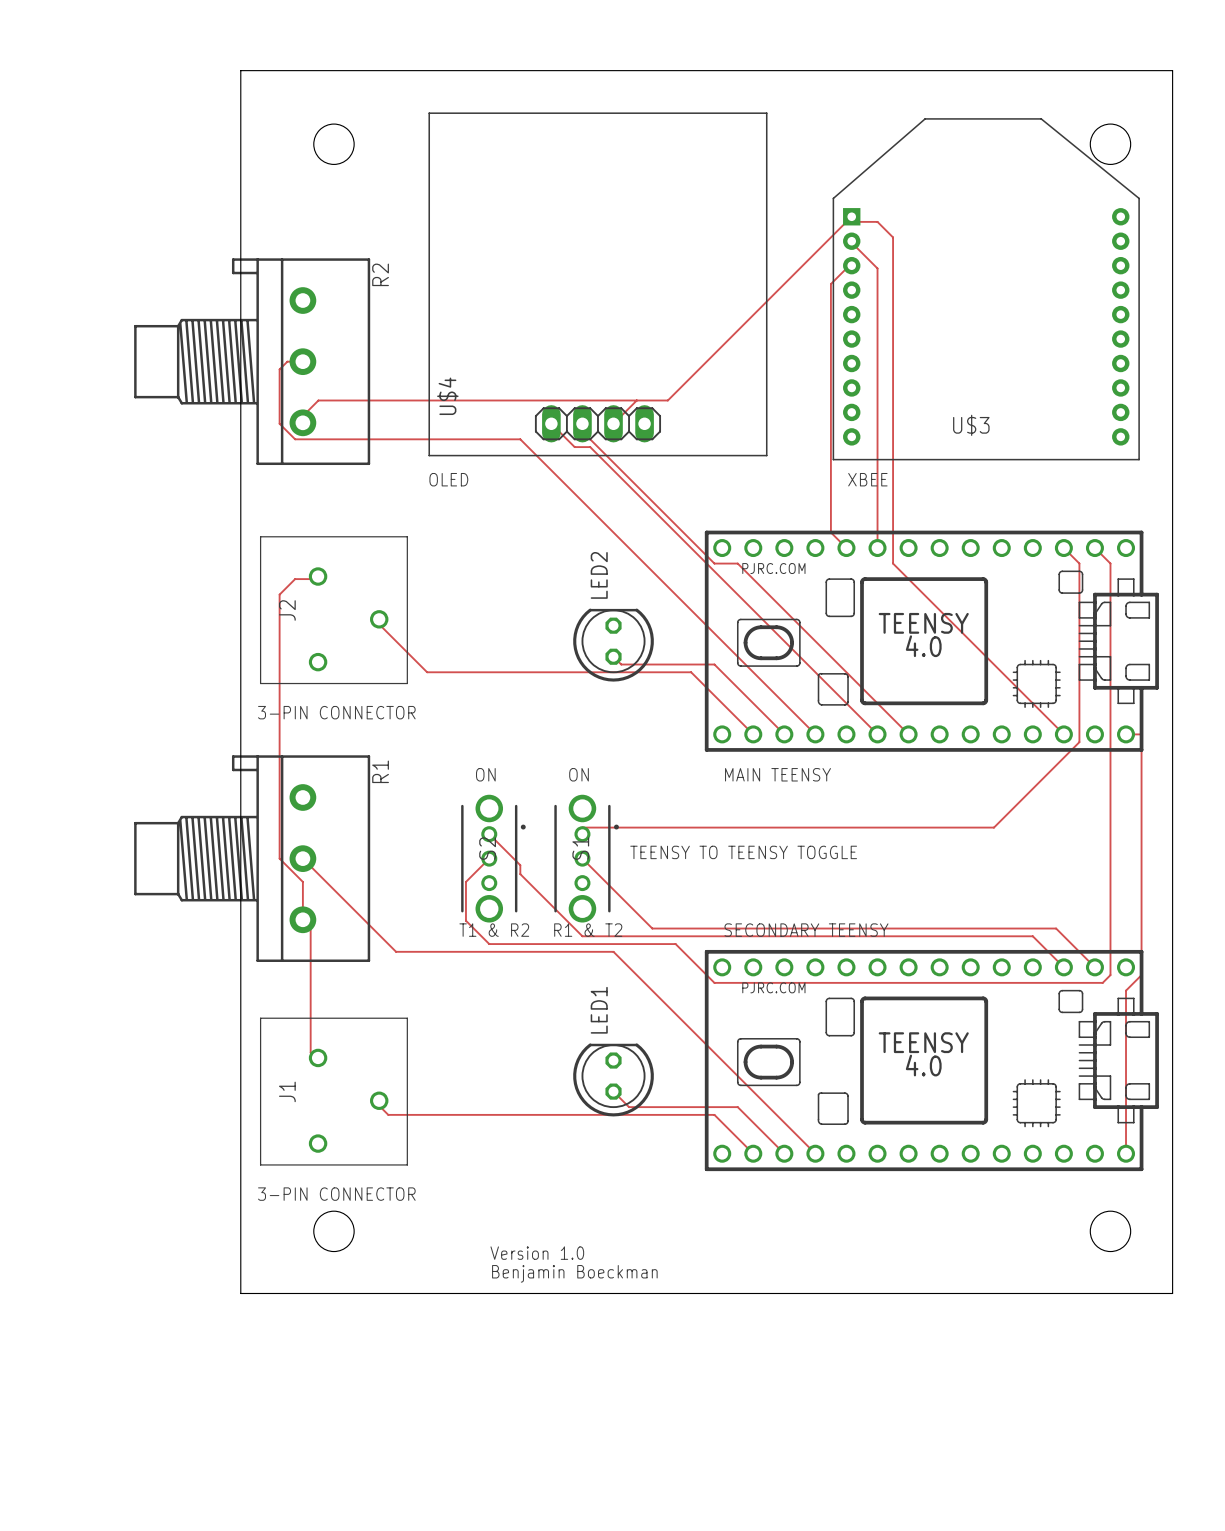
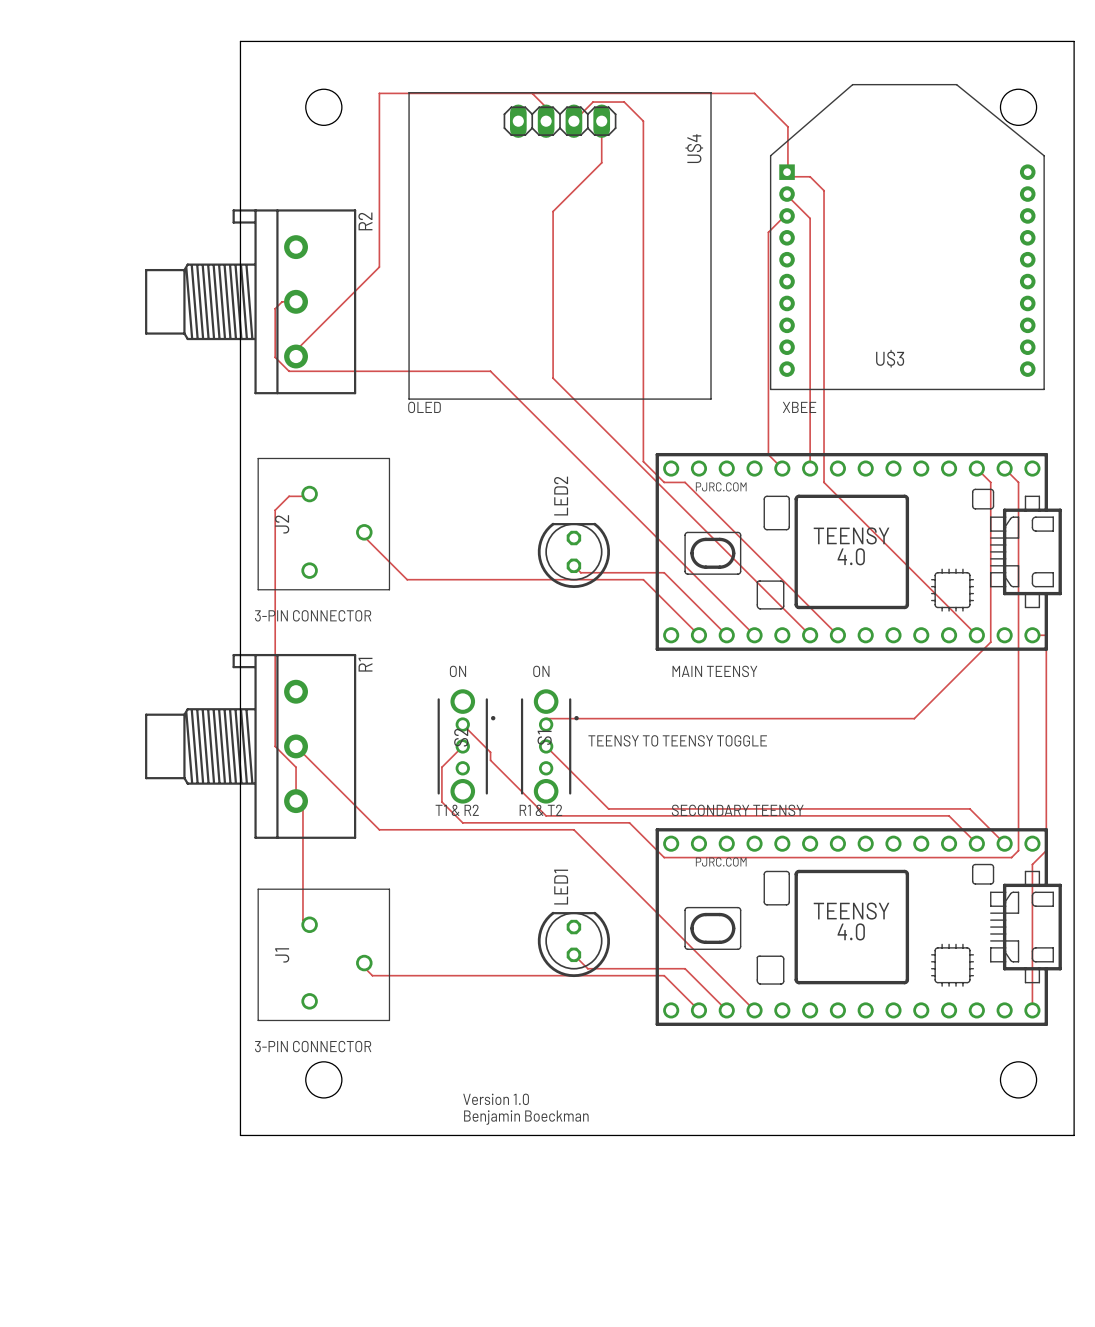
track: none -> (532, 93) (546, 107) (546, 121)
track: (846, 221) (667, 400) (318, 400) -> (787, 174) (787, 126) (754, 93) (379, 93) (379, 267) (309, 336)
U$4 rotation: 0° (597, 284) -> 180° (560, 245)
track: (636, 400) (613, 423) -> none
track: (551, 423) (574, 447) (590, 447) -> (601, 121) (601, 162) (553, 211) (553, 378)
track: (582, 423) (582, 431) (691, 540) -> (573, 121) (593, 102) (624, 102) (643, 121) (643, 461)

